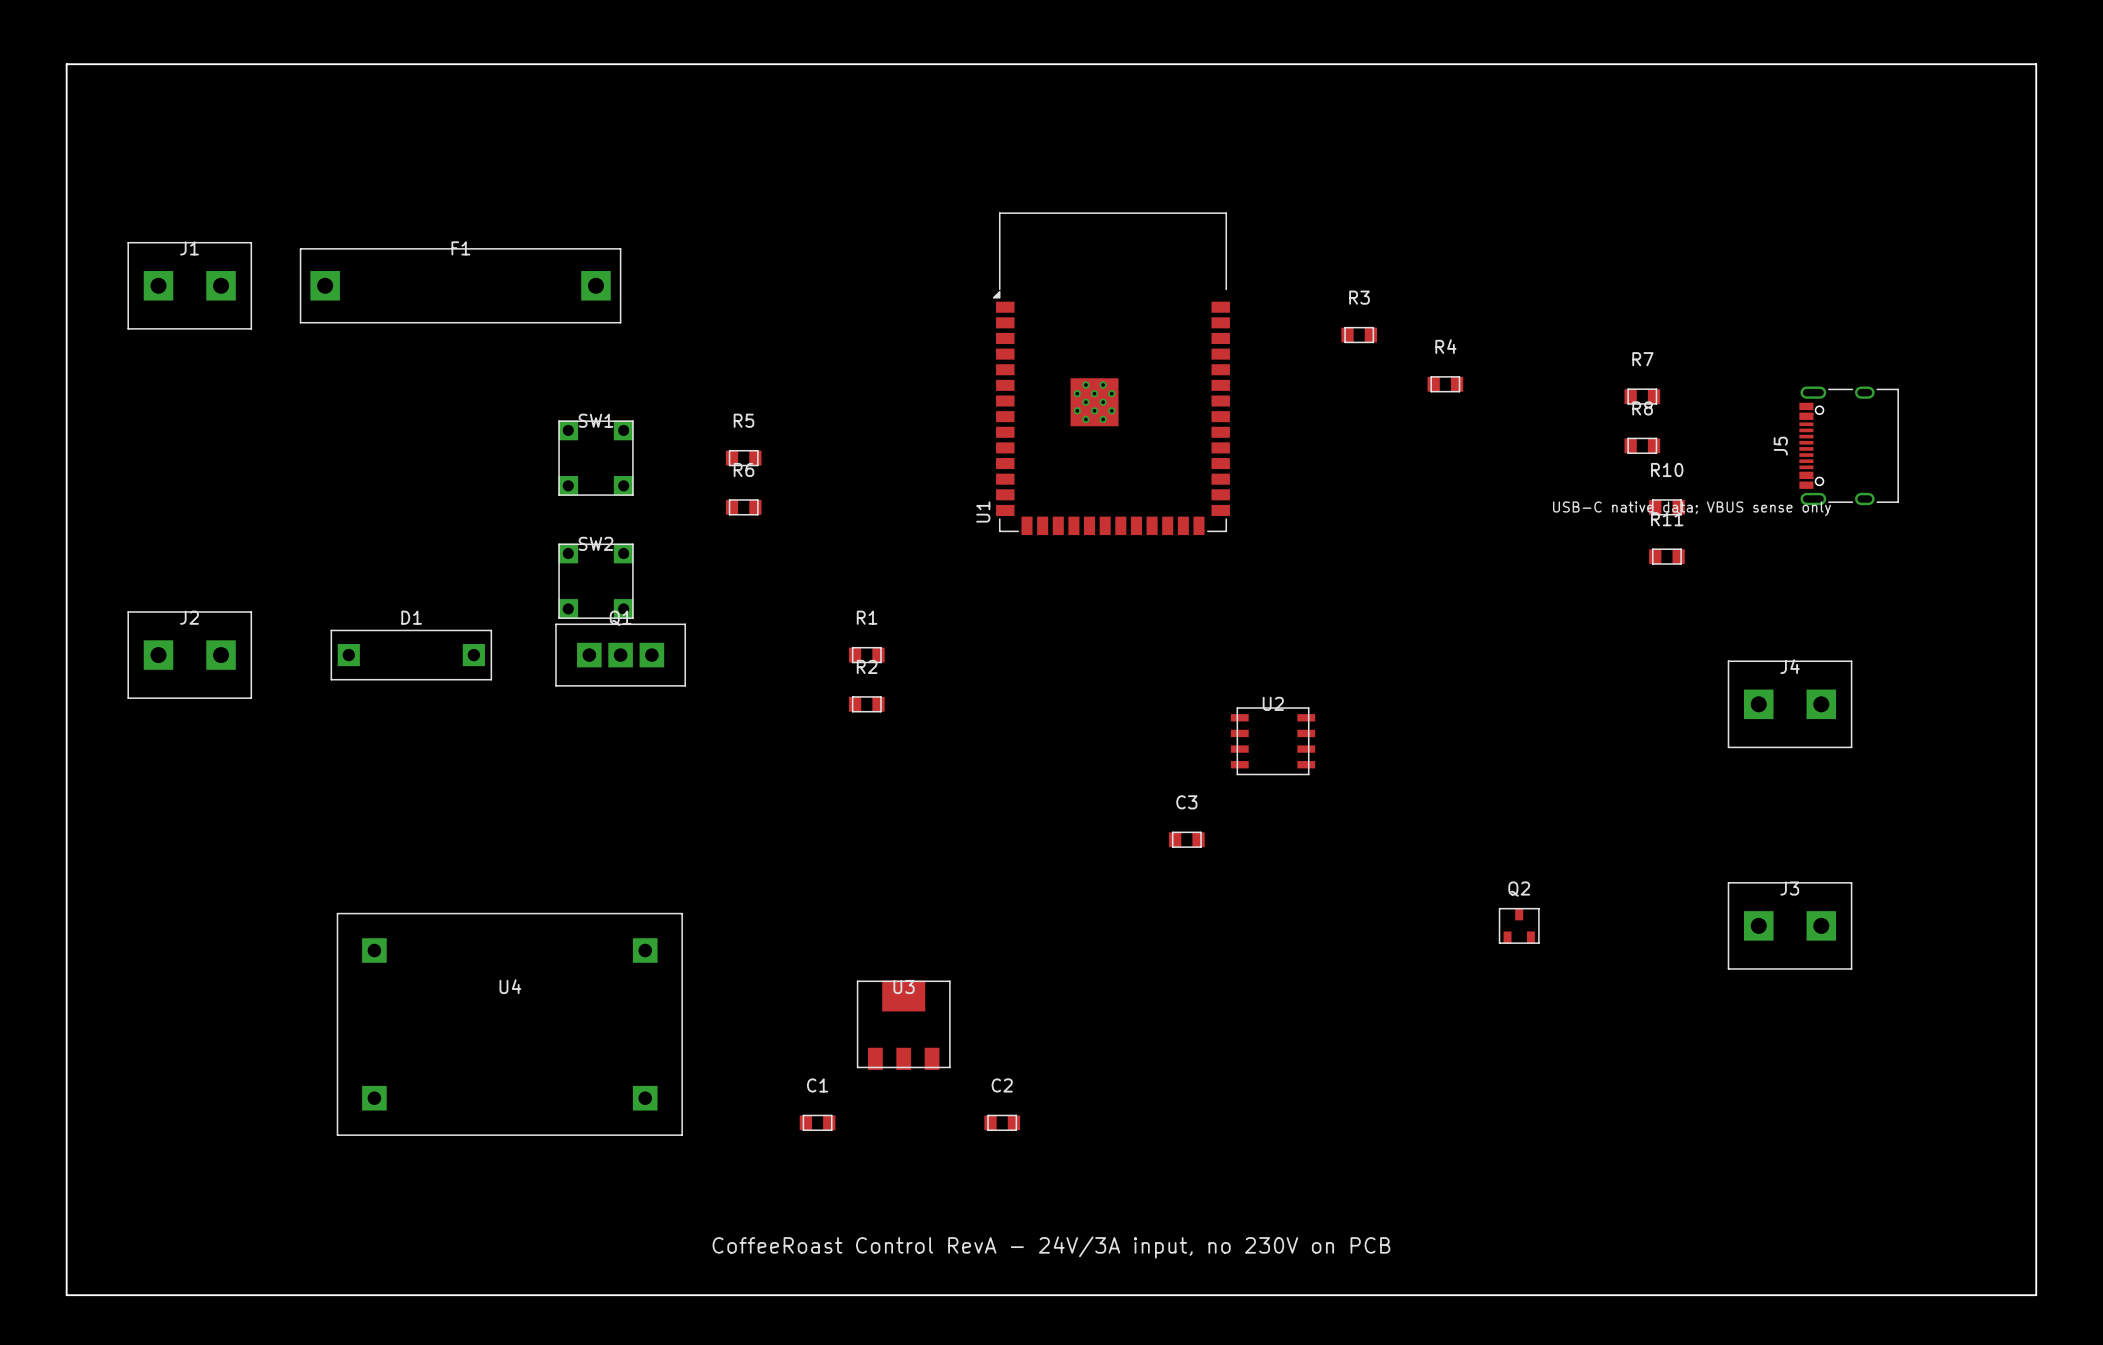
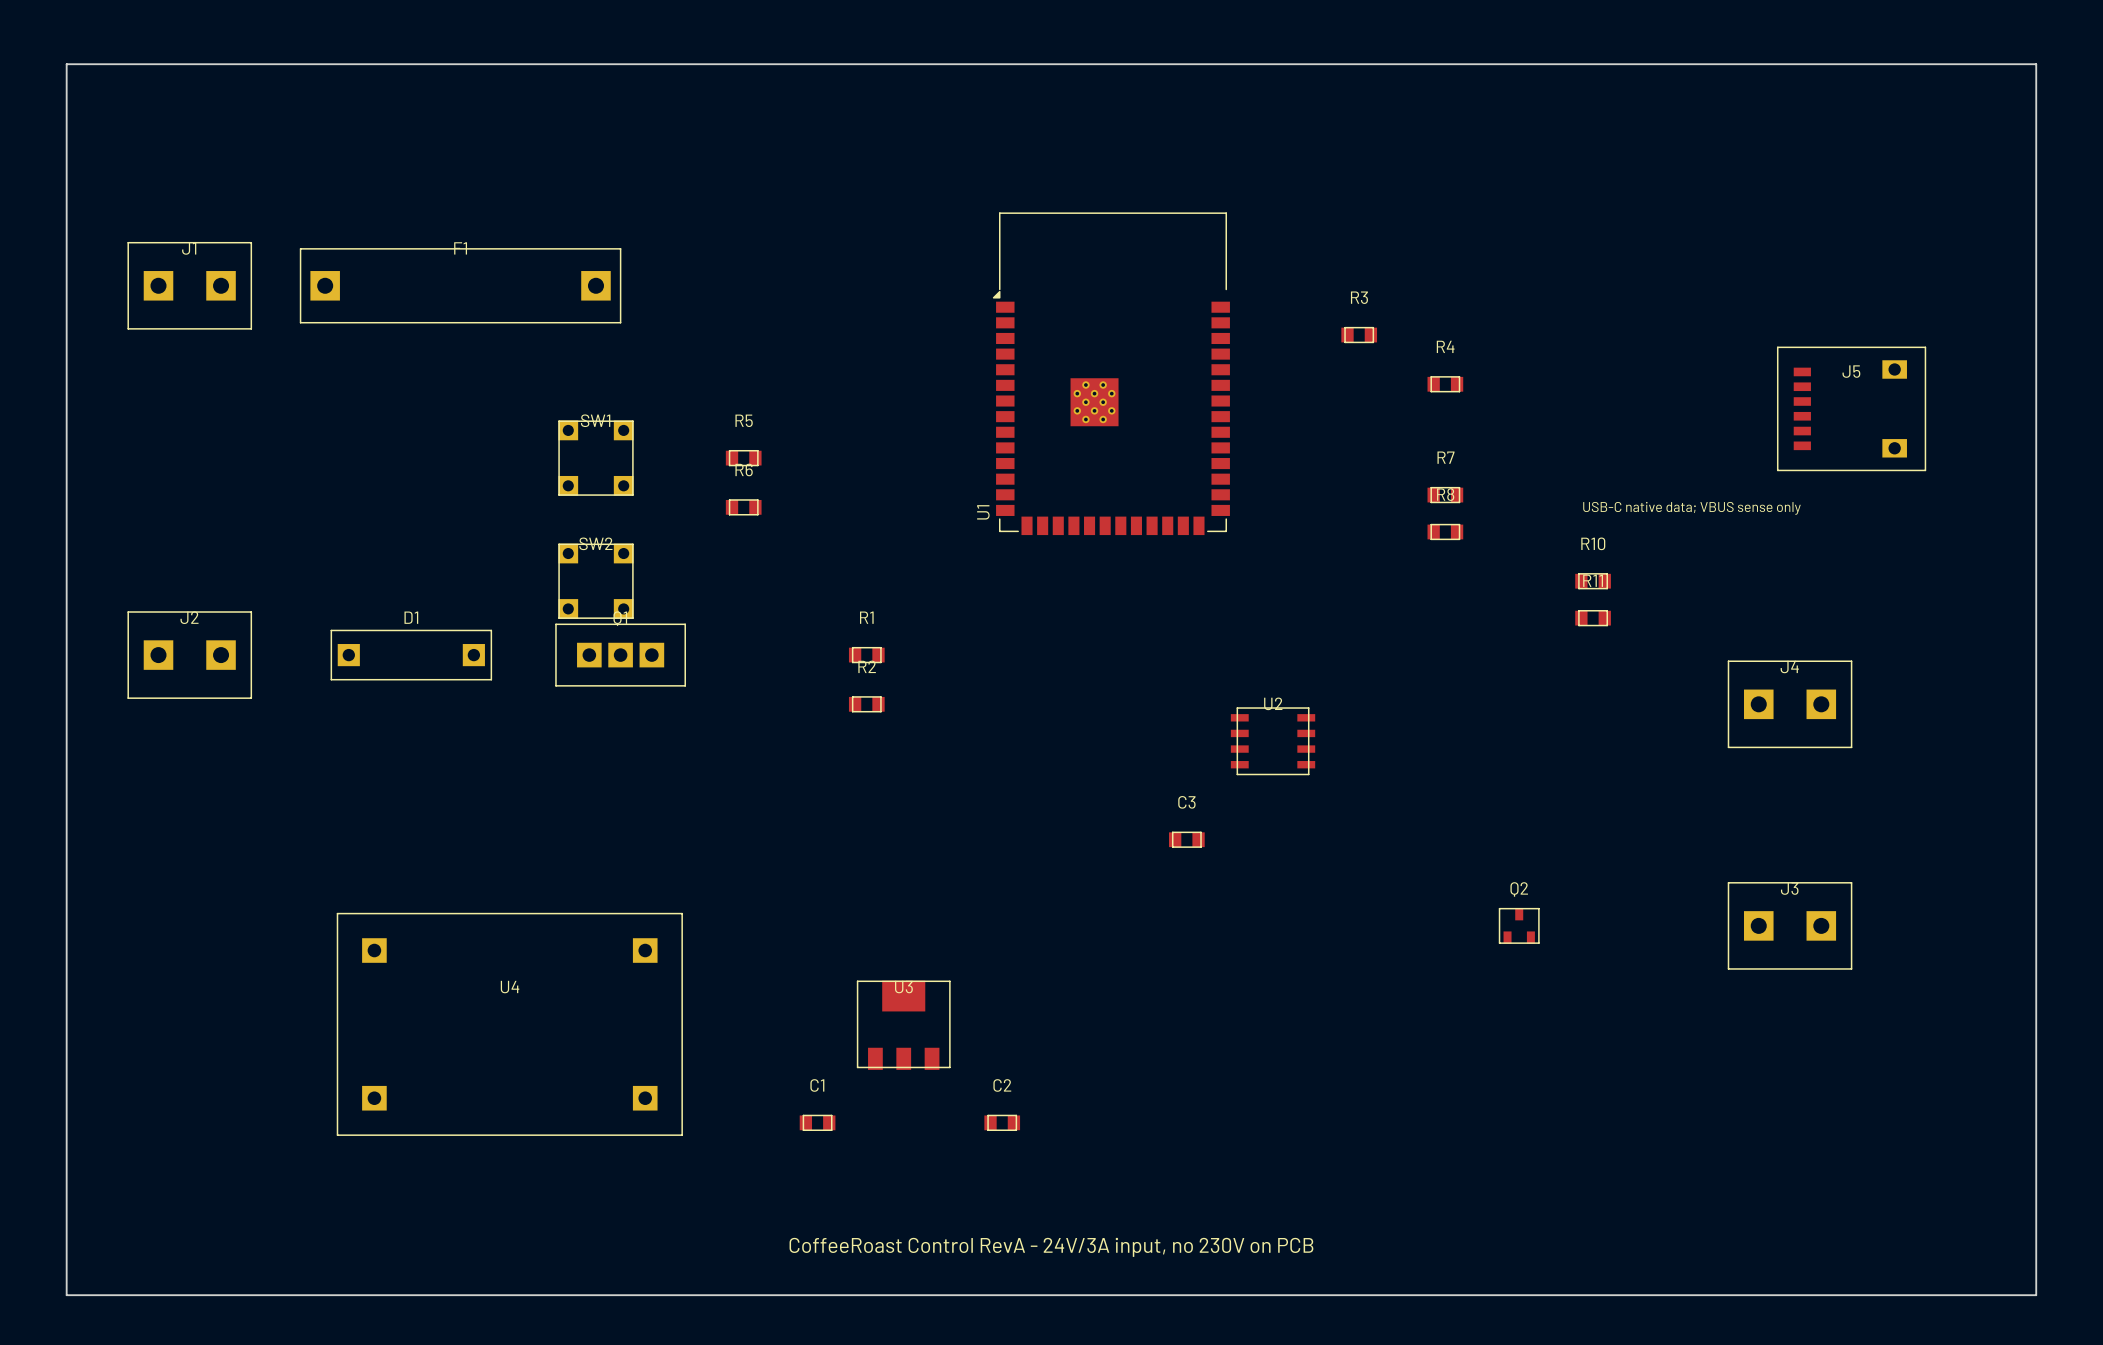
J5 footprint: [1799, 386, 1899, 506] -> [1776, 346, 1927, 472]
R7 position: (1642, 396) -> (1445, 495)
R8 position: (1642, 445) -> (1445, 531)
J5 name position: J5 (1780, 446) -> J5 (1851, 371)
R10 position: (1666, 507) -> (1593, 581)
R11 position: (1666, 556) -> (1593, 618)

